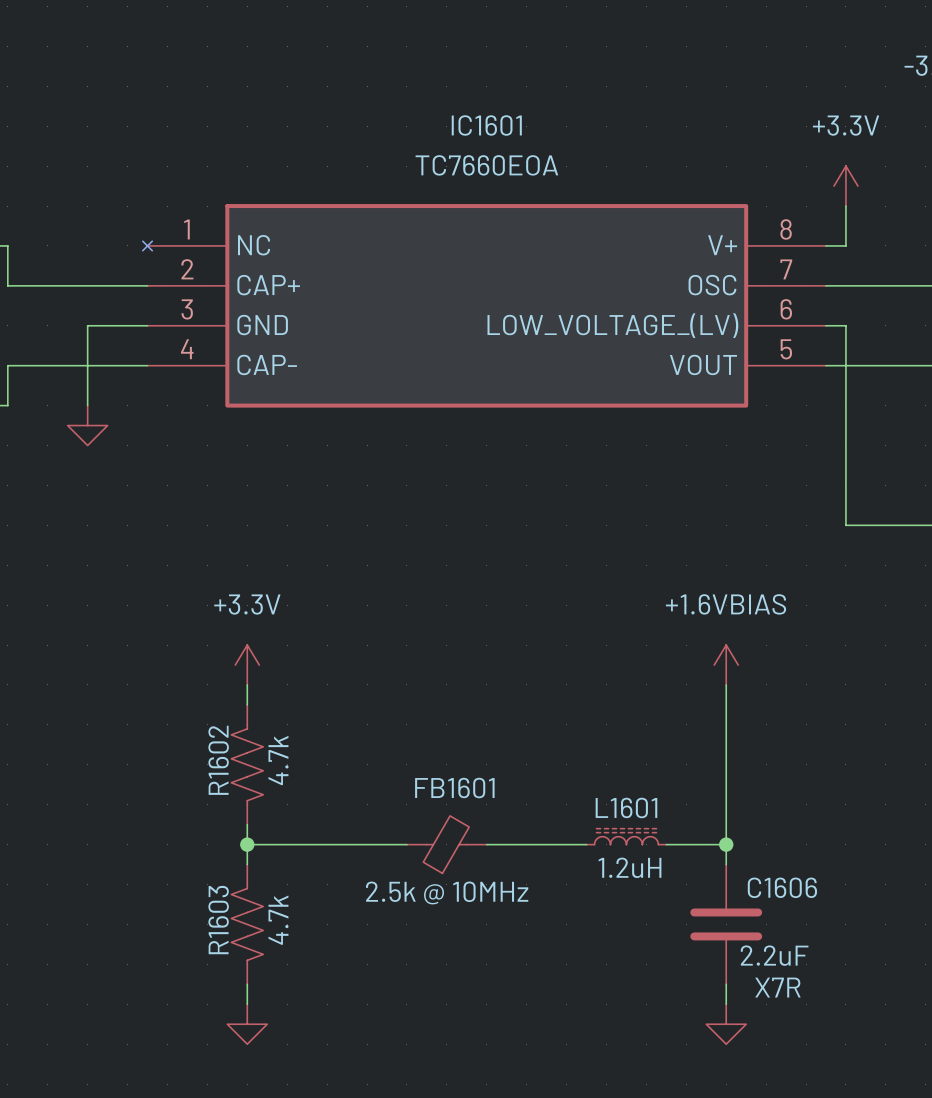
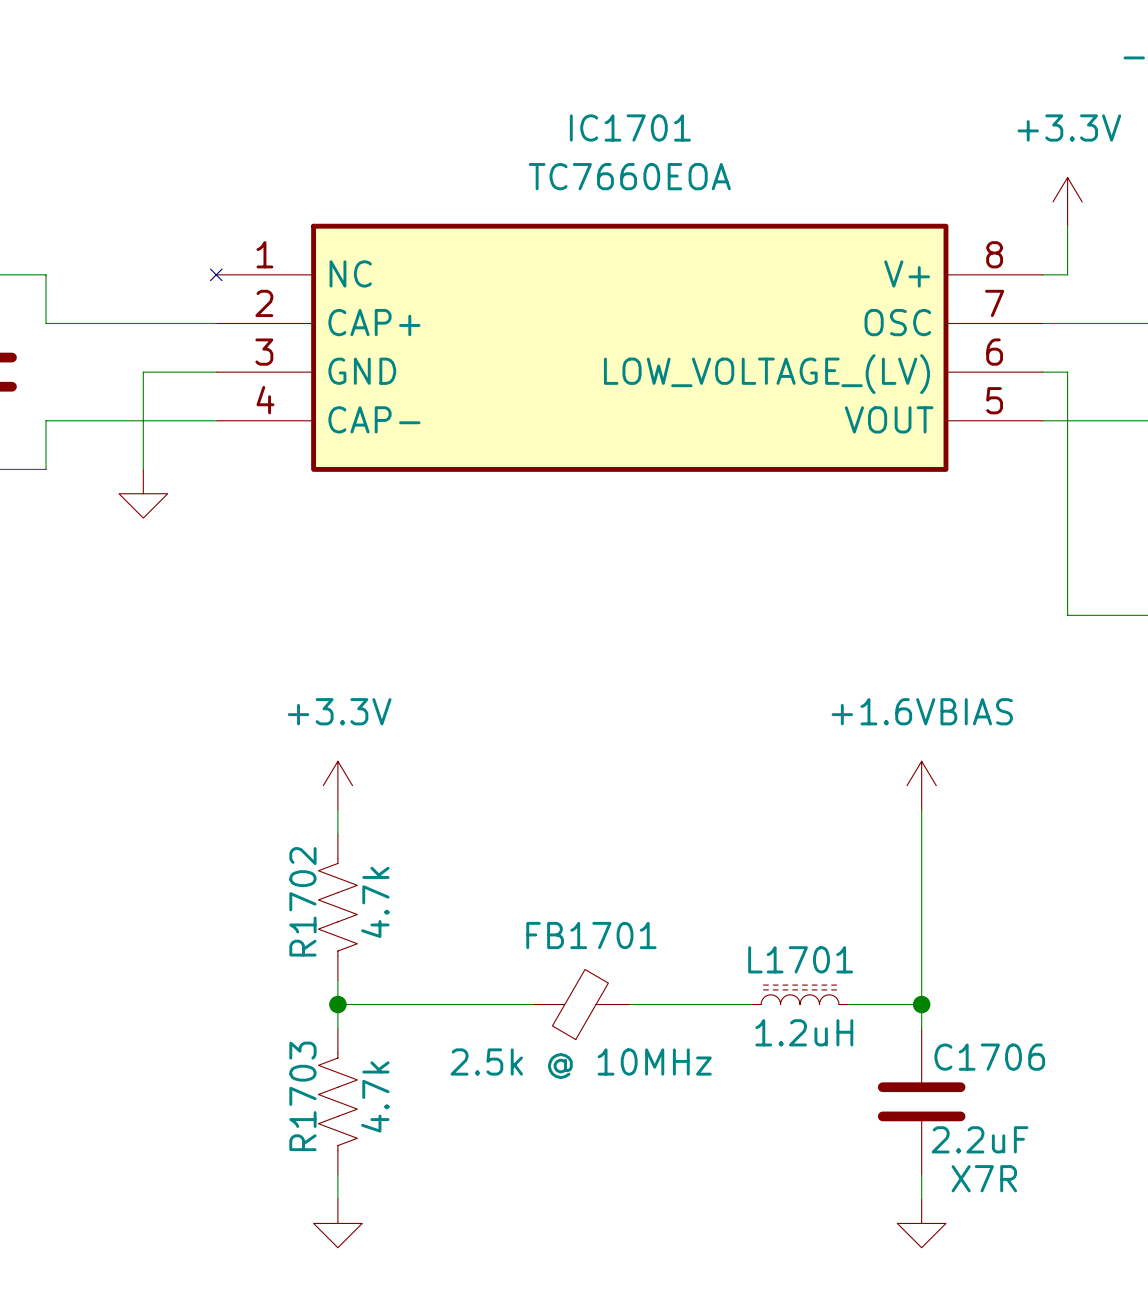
IC1601 name: IC1601 (486, 125) -> IC1701 (630, 128)
R1602 name: R1602 (218, 760) -> R1702 (302, 901)
FB1601 name: FB1601 (454, 788) -> FB1701 (591, 935)
L1601 name: L1601 (626, 807) -> L1701 (800, 959)
C1606 name: C1606 (782, 887) -> C1706 (989, 1057)
R1603 name: R1603 (218, 920) -> R1703 (302, 1096)

